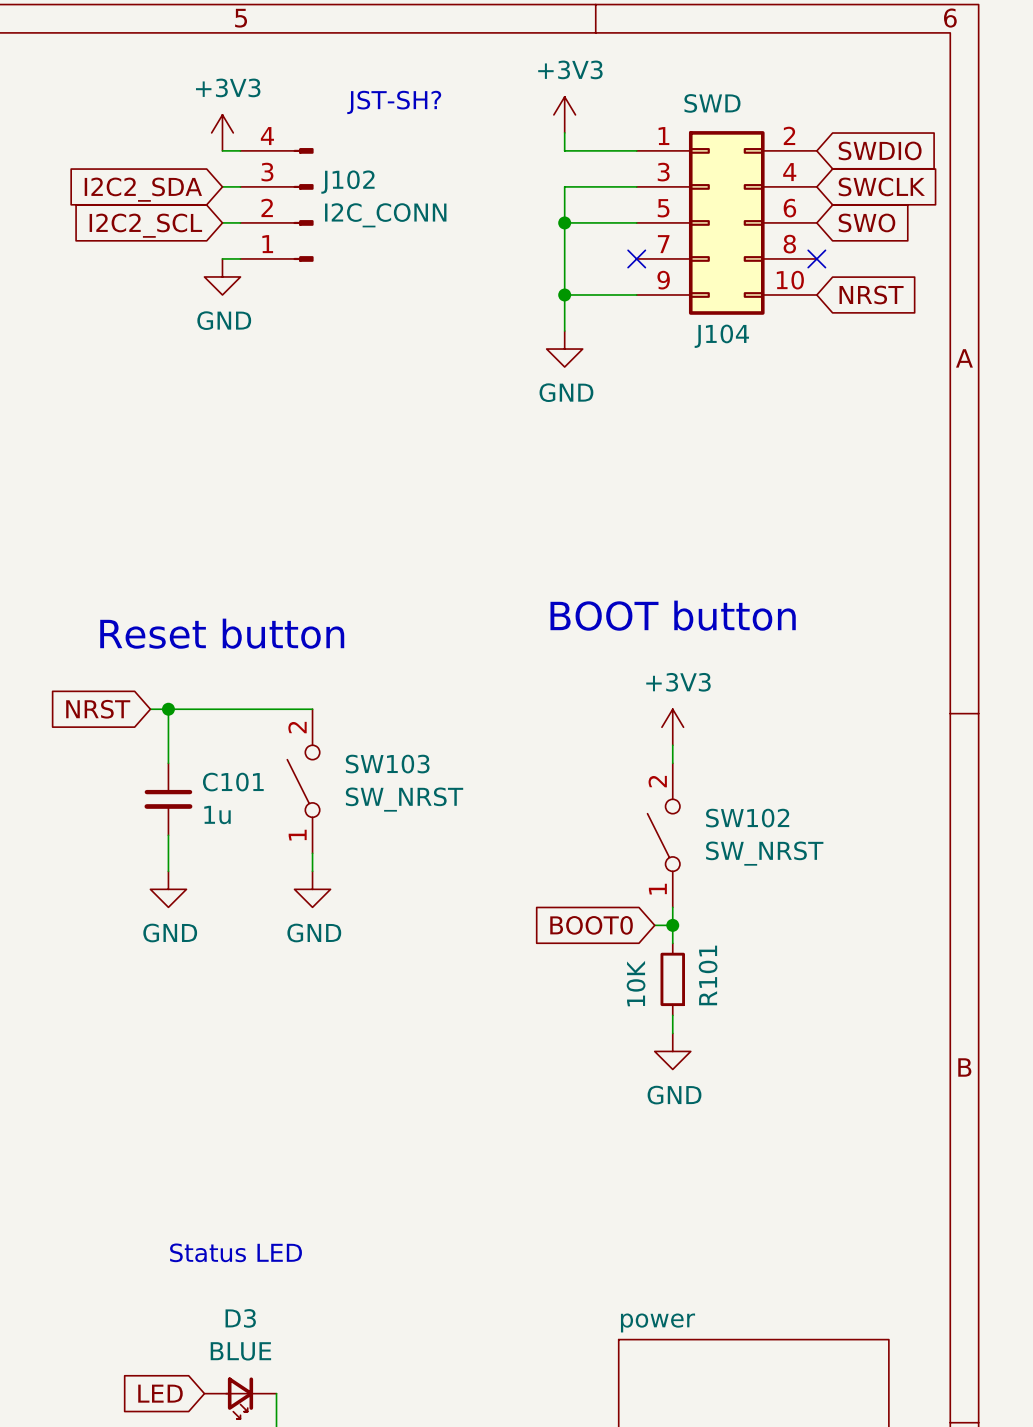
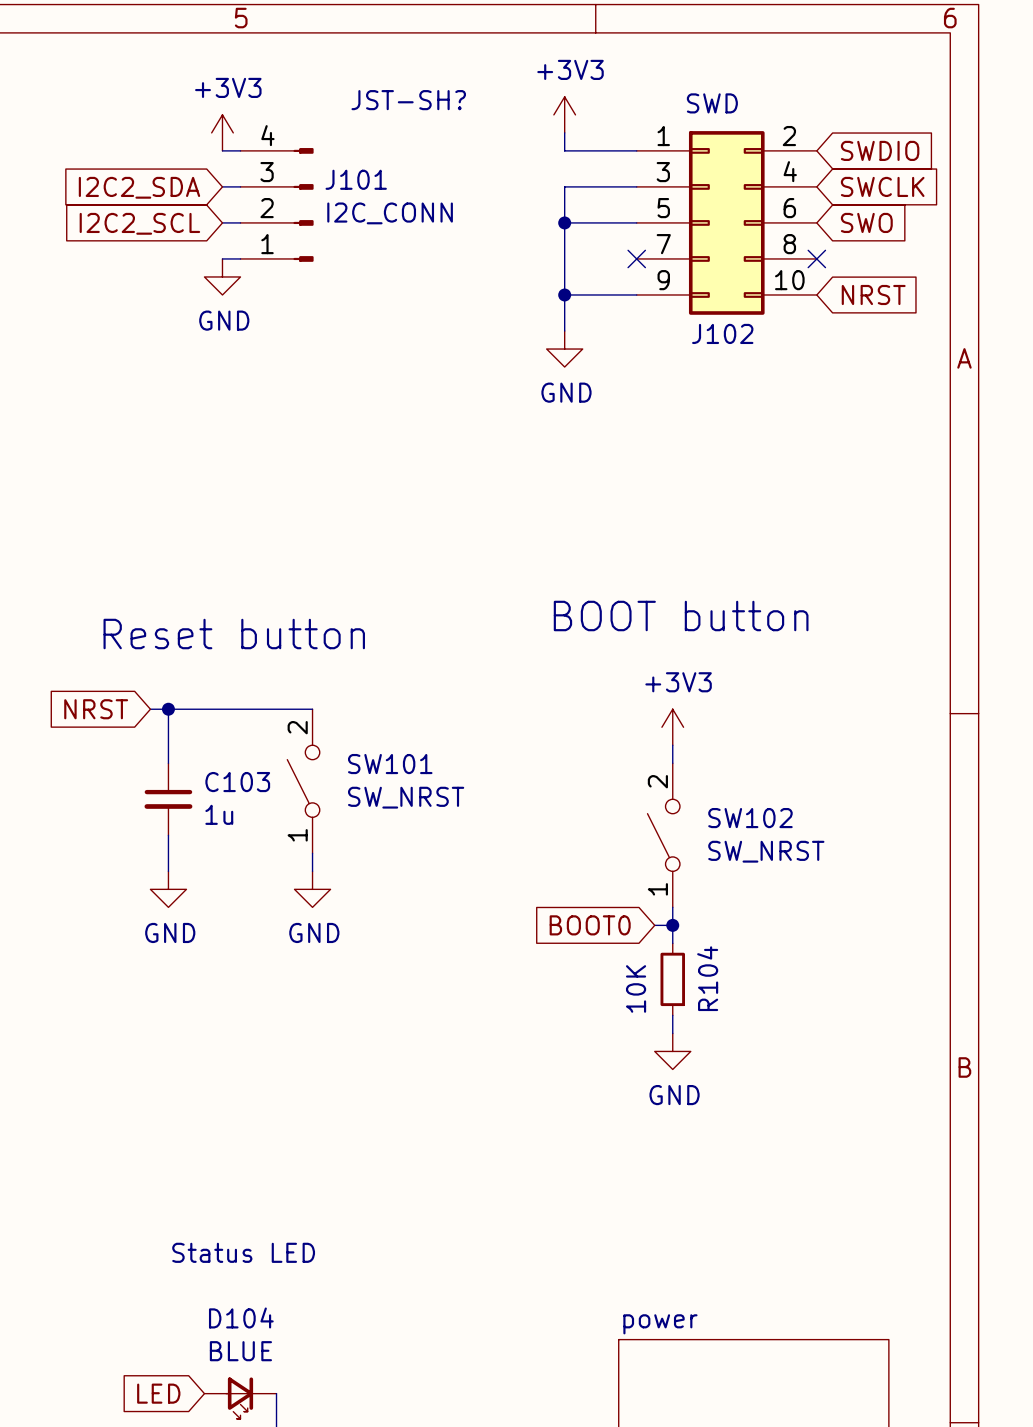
J102 name: J102 (347, 182) -> J101 (356, 179)
J104 name: J104 (721, 336) -> J102 (722, 333)
SW103 name: SW103 (387, 764) -> SW101 (390, 764)
C101 name: C101 (233, 782) -> C103 (237, 782)
R101 name: R101 (708, 975) -> R104 (707, 978)
D3 name: D3 (240, 1318) -> D104 (241, 1317)

